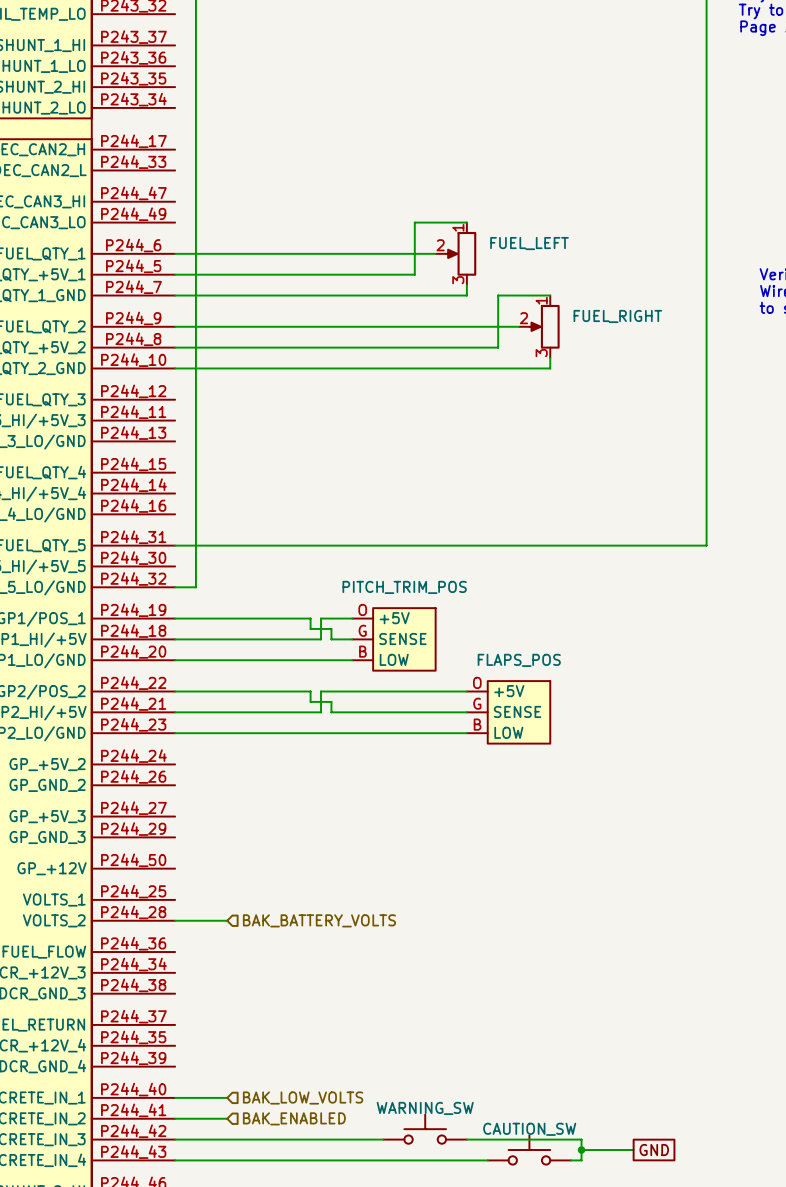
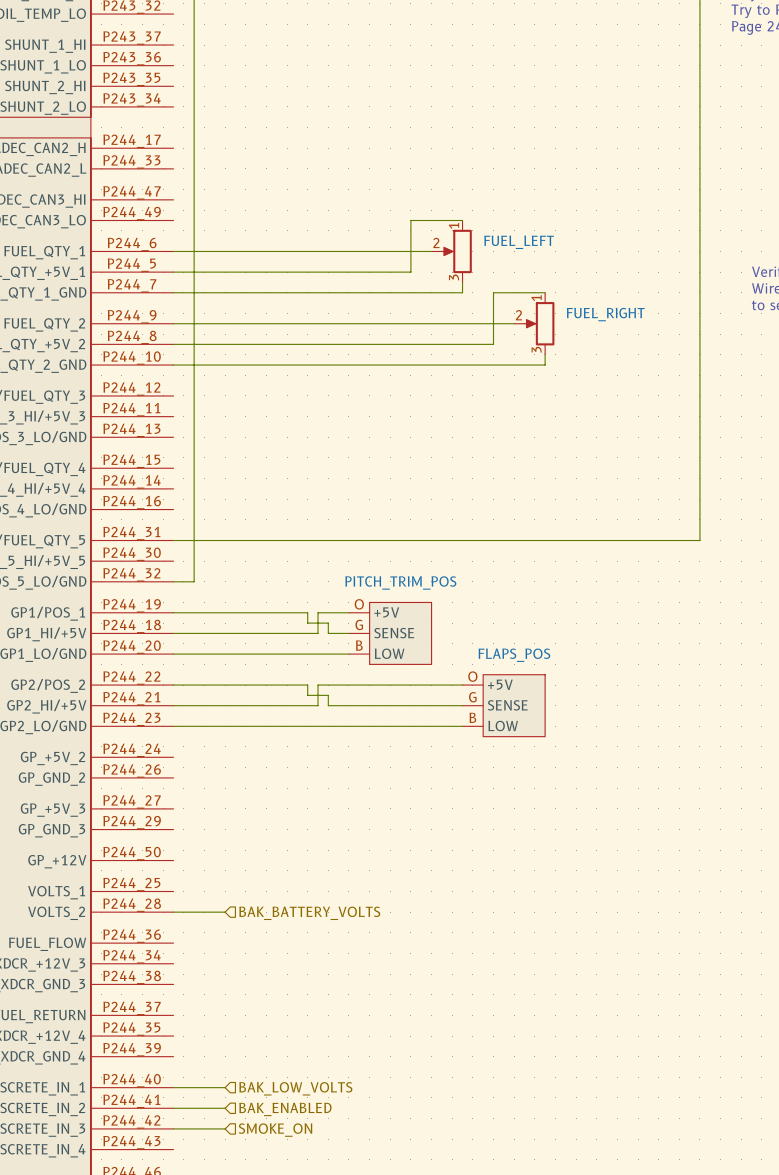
WARNING_SW: (425, 1129) -> none
wire: (227, 1139) (383, 1139) -> none
hierarchical label: none -> SMOKE_ON (275, 1130)
wire: (466, 1139) (581, 1139) (581, 1160) (571, 1160) -> none
CAUTION_SW: (529, 1150) -> none
wire: (581, 1150) (633, 1150) -> none
junction: (581, 1150) -> none
global label: GND (654, 1150) -> none
wire: (175, 1160) (487, 1160) -> none

